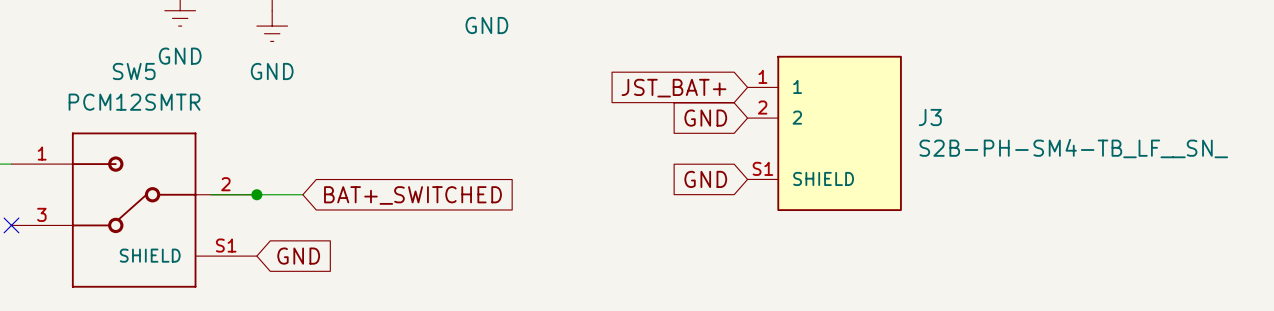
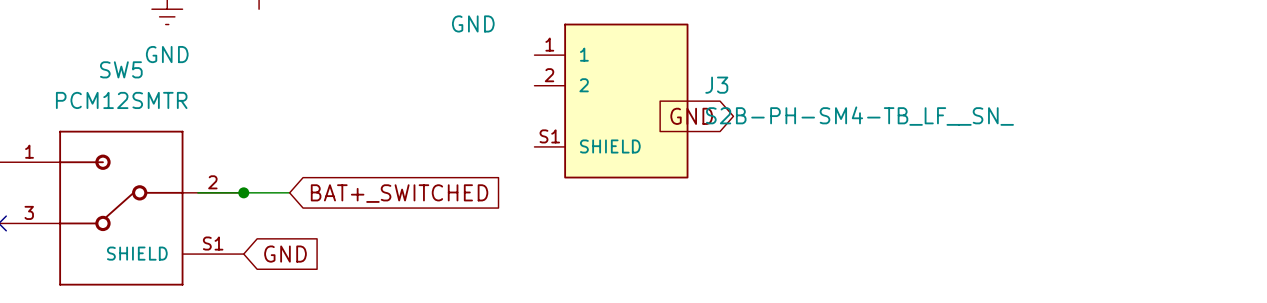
power symbol: GND (272, 26) -> none
global label: JST_BAT+ (674, 88) -> none
J3 position: (824, 133) -> (611, 101)
global label: GND (705, 179) -> none

